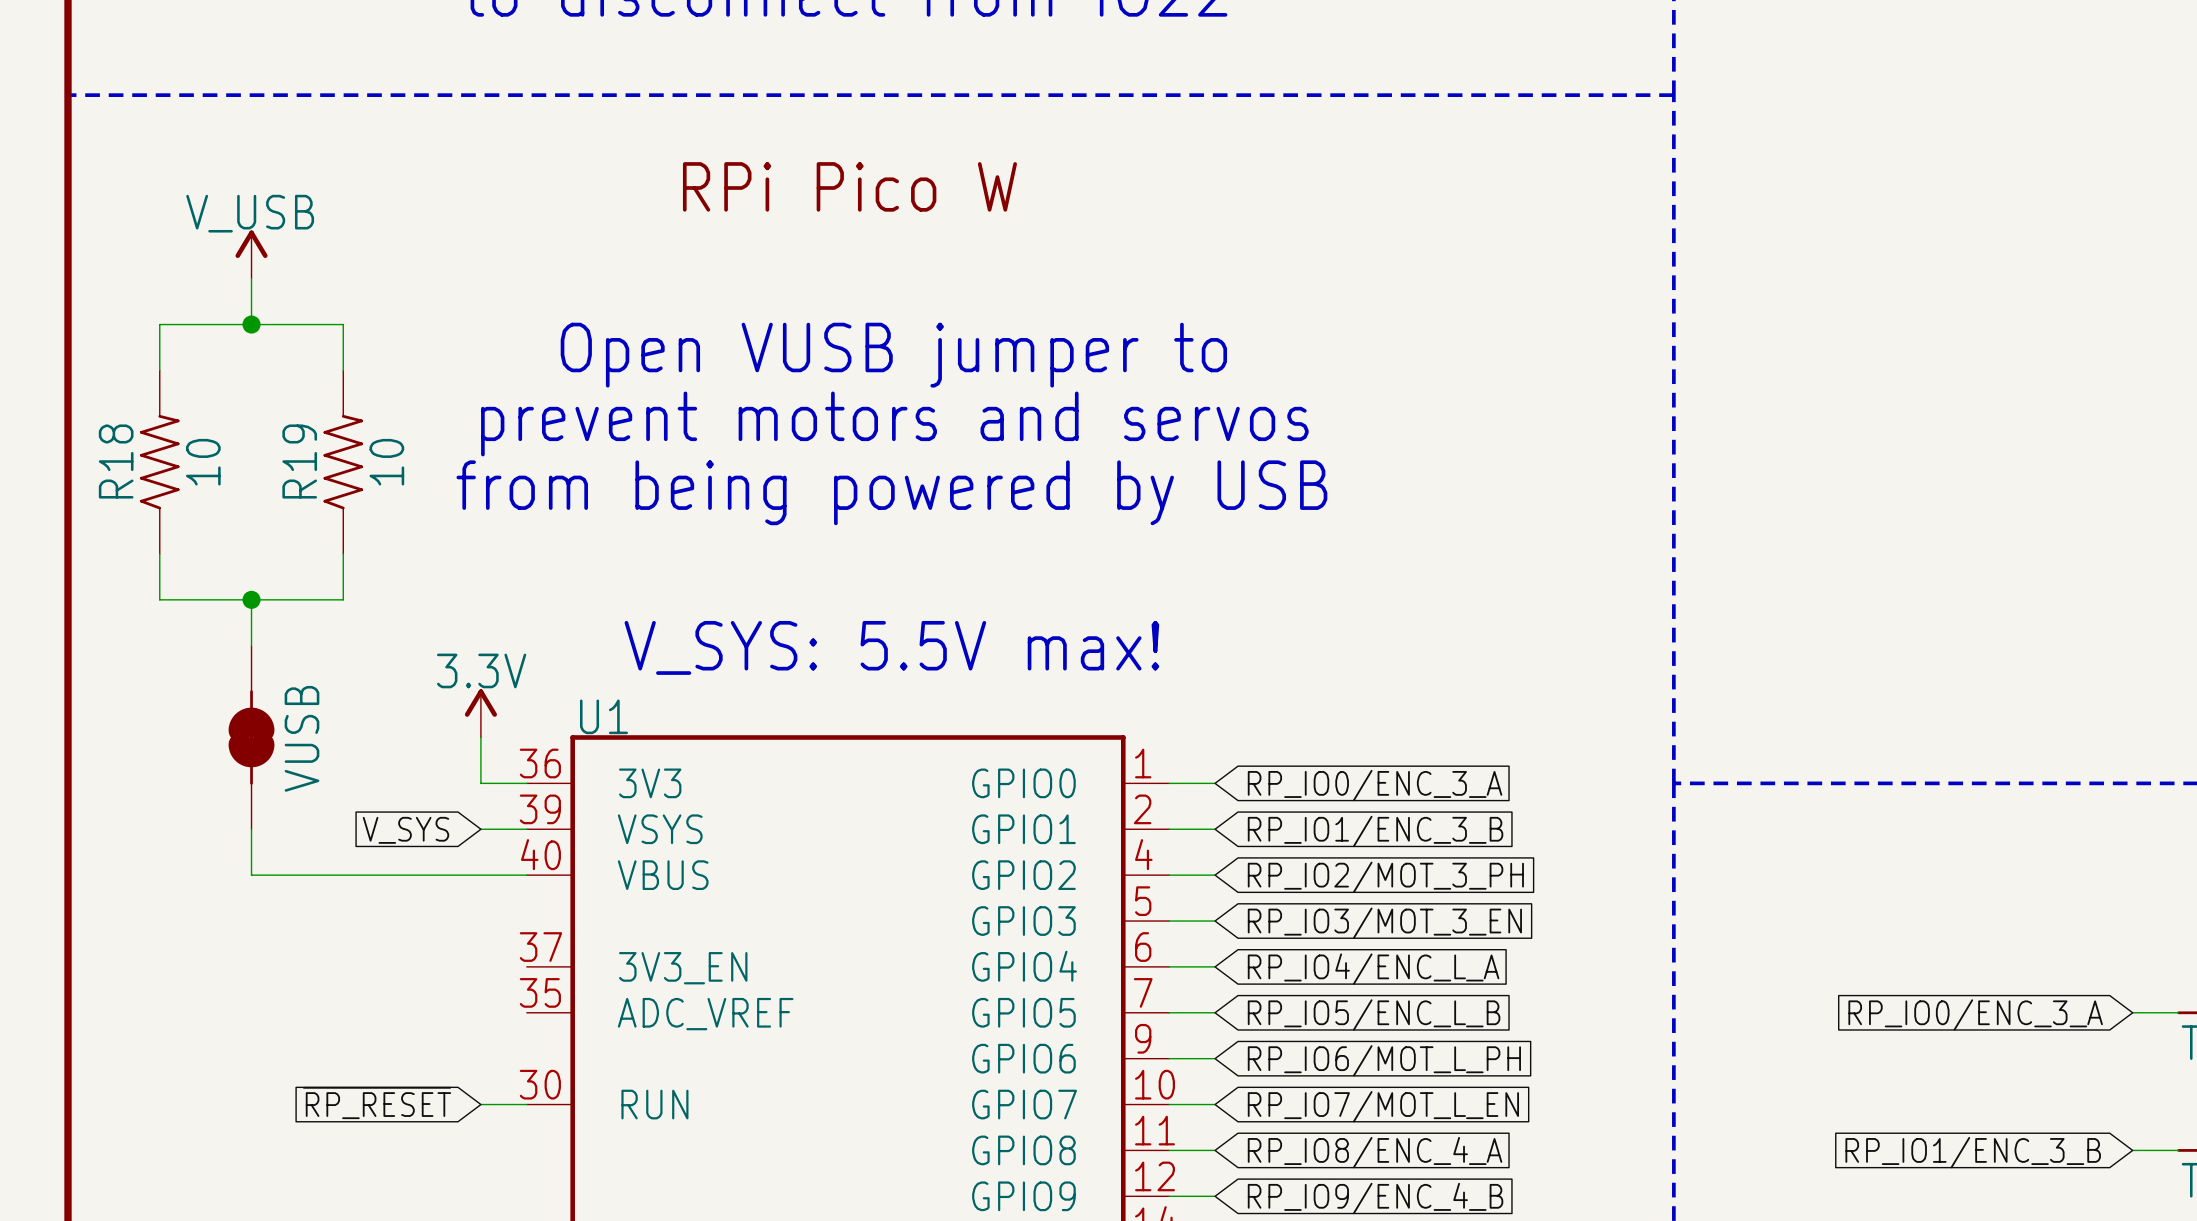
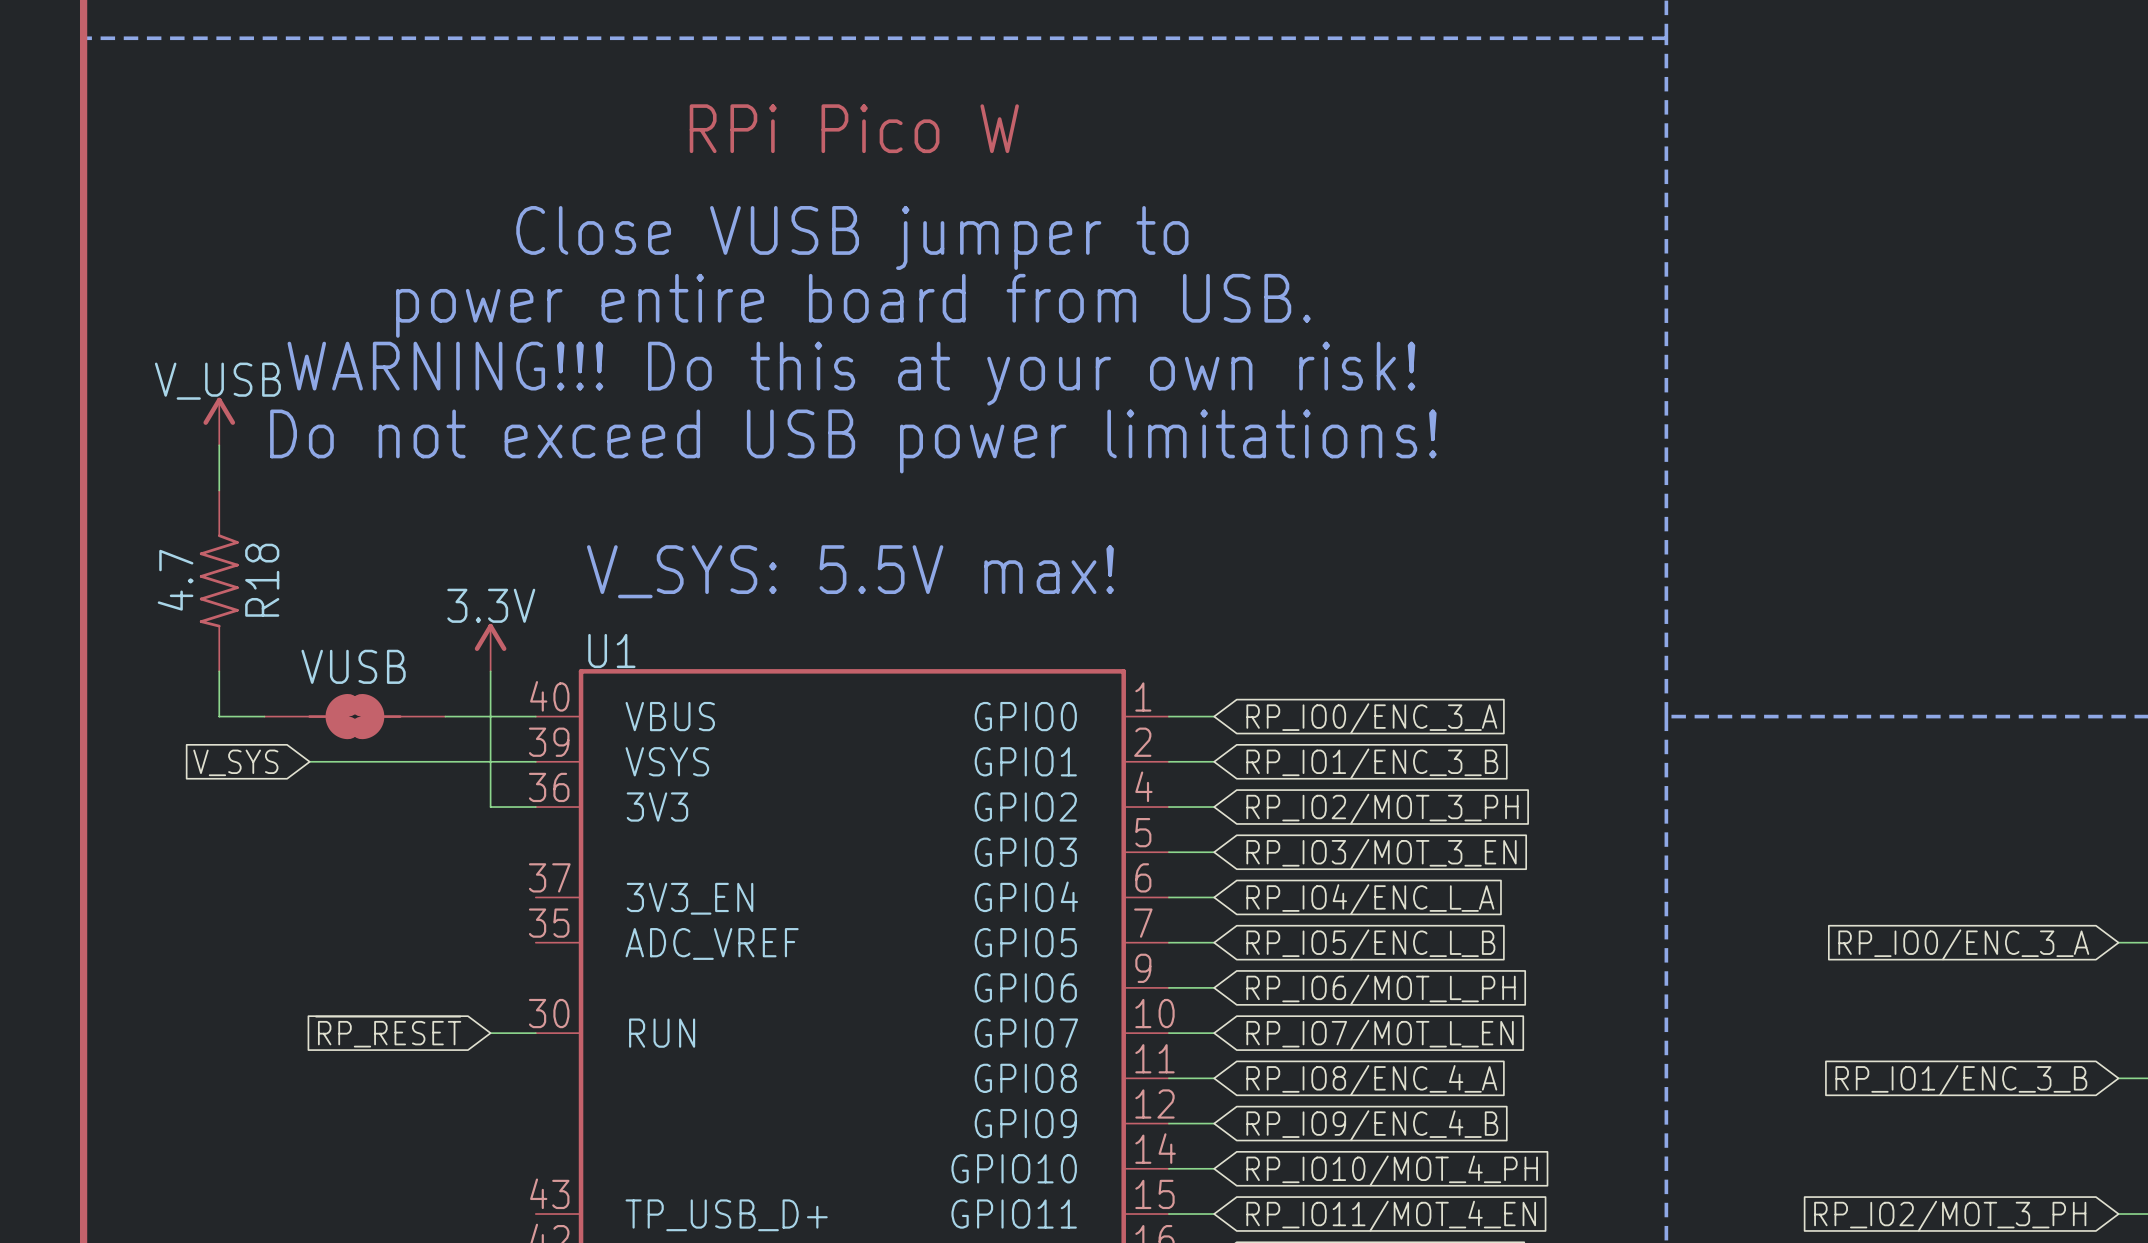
power symbol position: V_USB (251, 254) -> V_USB (219, 421)
wire: (251, 278) (251, 324) -> none
junction: (251, 324) -> none
text: Open VUSB jumper to (893, 355) -> Close VUSB jumper to (852, 237)
text: none -> power entire board from USB. (853, 305)
wire: (159, 370) (159, 324) (343, 324) (343, 370) -> none
text: prevent motors and servos (894, 423) -> none
text: none -> WARNING!!! Do this at your own risk! (851, 373)
R18 rotation: 0° (159, 462) -> 180° (219, 580)
R18 position: (159, 462) -> (219, 580)
R18 value: 10 (203, 462) -> 4.7 (175, 580)
R19: 10 (343, 462) -> none
text: from being powered by USB (891, 492) -> none
text: none -> Do not exceed USB power limitations! (853, 441)
wire: (159, 553) (159, 599) (343, 599) (343, 553) -> none
wire: (251, 599) (251, 645) -> (219, 445) (219, 490)
junction: (251, 599) -> none
text position: V_SYS: 5.5V max! (891, 647) -> V_SYS: 5.5V max! (850, 571)
wire: none -> (219, 671) (219, 716) (264, 716)
VUSB: (251, 737) -> none
U1 pin number: 36 (540, 763) -> 40 (549, 696)
VUSB: none -> (354, 716)
U1 pin name: 3V3 (650, 783) -> VBUS (670, 716)
wire: (251, 829) (251, 875) (480, 875) -> (445, 716) (490, 716) (490, 807)
wire: none -> (309, 761) (490, 761)
global label position: V_SYS (405, 830) -> V_SYS (235, 762)
U1 pin number: 40 (540, 854) -> 36 (549, 787)
U1 pin name: VBUS (663, 875) -> 3V3 (657, 807)

